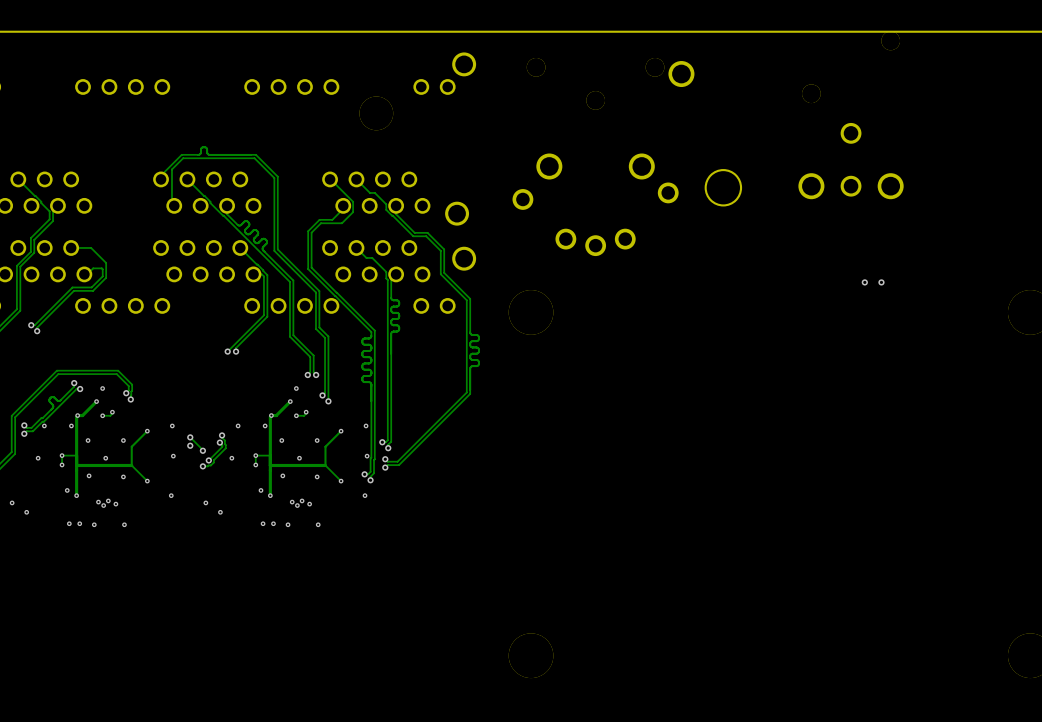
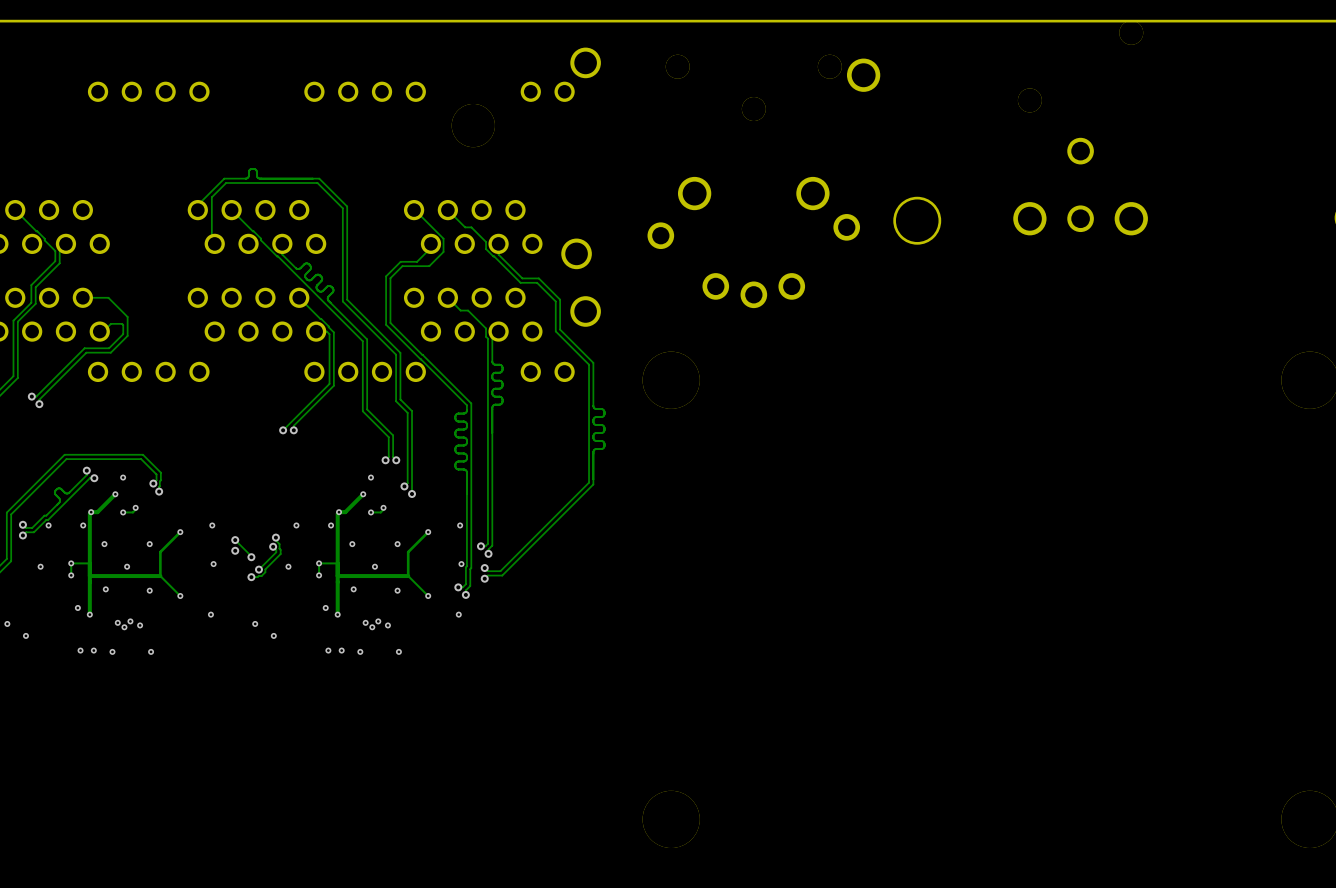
via: (864, 282) -> none
via: (881, 282) -> none

